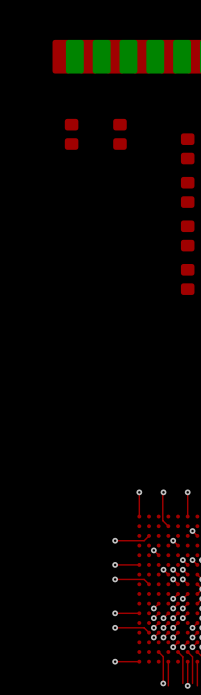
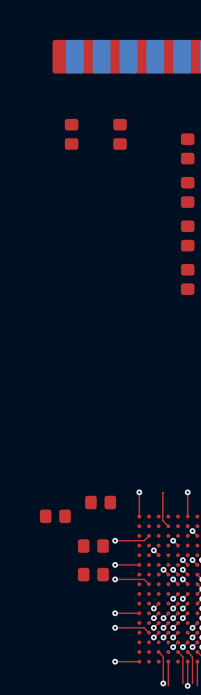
via: (163, 492) -> none
part: none -> (100, 502)
part: none -> (55, 516)
part: none -> (93, 546)
part: none -> (93, 574)

